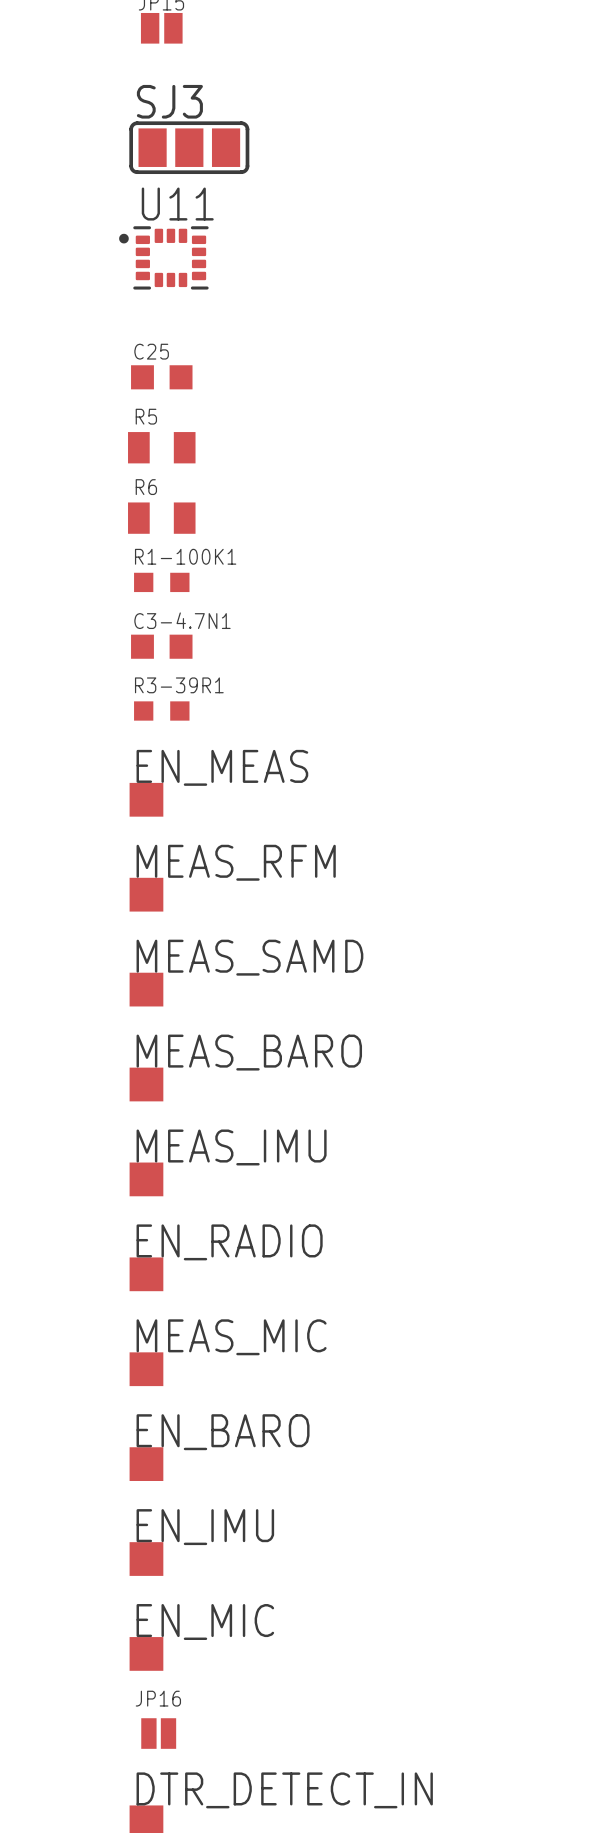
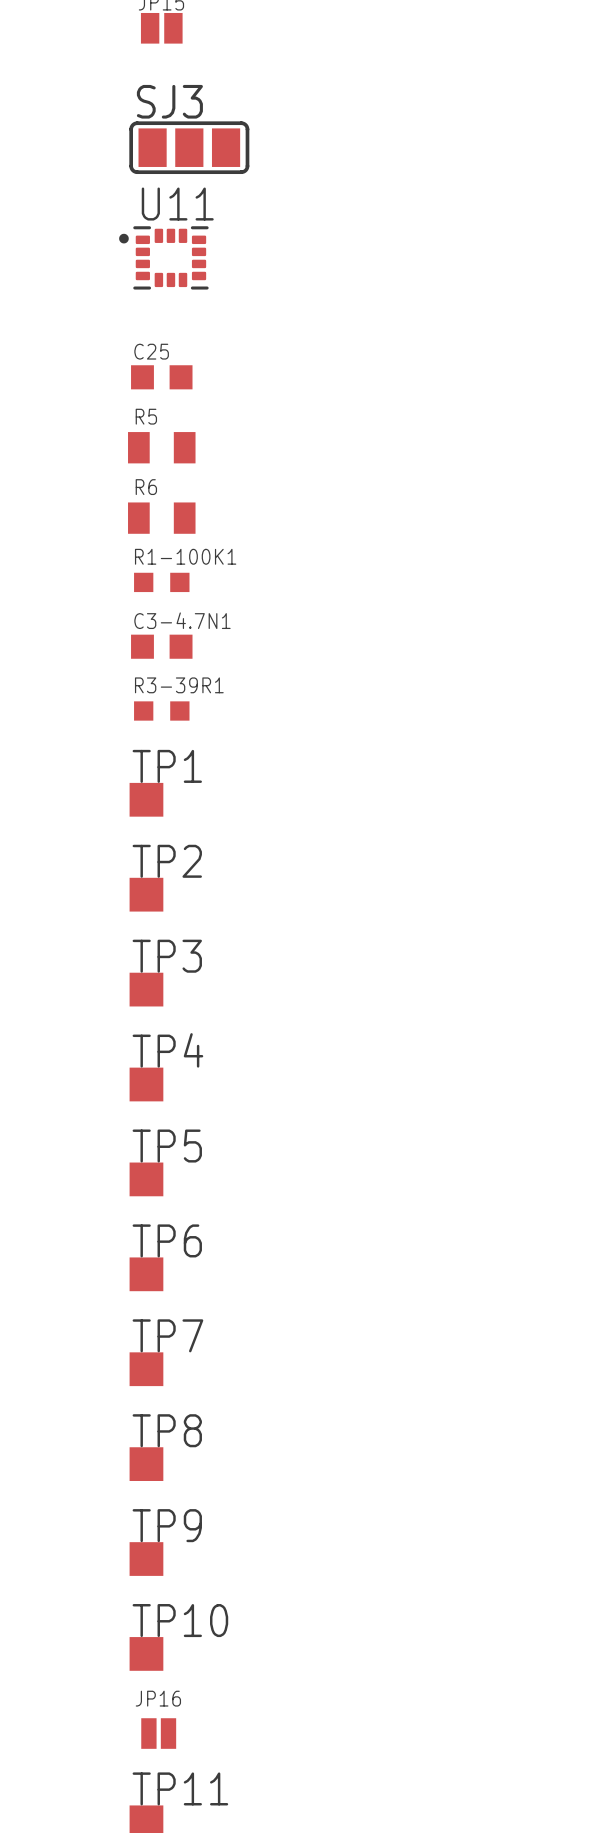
EN_MEAS name: EN_MEAS (222, 767) -> TP1 (167, 766)
MEAS_RFM name: MEAS_RFM (236, 862) -> TP2 (167, 861)
MEAS_SAMD name: MEAS_SAMD (249, 957) -> TP3 (167, 956)
MEAS_BARO name: MEAS_BARO (249, 1052) -> TP4 (167, 1050)
MEAS_IMU name: MEAS_IMU (231, 1147) -> TP5 (167, 1146)
EN_RADIO name: EN_RADIO (229, 1242) -> TP6 (167, 1240)
MEAS_MIC name: MEAS_MIC (231, 1337) -> TP7 (167, 1335)
EN_BARO name: EN_BARO (223, 1432) -> TP8 (167, 1430)
EN_IMU name: EN_IMU (205, 1527) -> TP9 (167, 1525)
EN_MIC name: EN_MIC (205, 1622) -> TP10 (180, 1620)
DTR_DETECT_IN name: DTR_DETECT_IN (284, 1790) -> TP11 (180, 1788)

